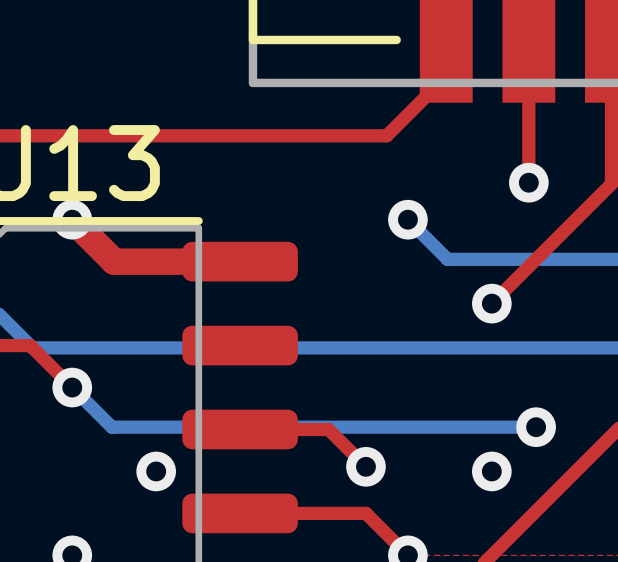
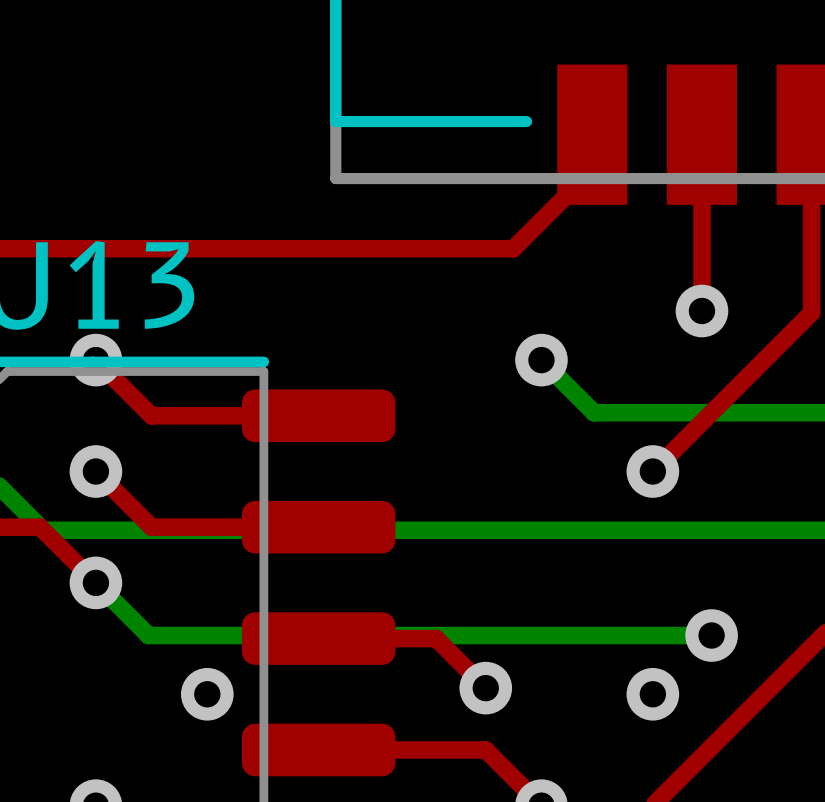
top track width: thick (72, 219) (114, 261) (240, 261) -> thin (95, 360) (151, 415) (318, 415)
top track: none -> (95, 471) (151, 527) (318, 527)
via: none -> (95, 471)

